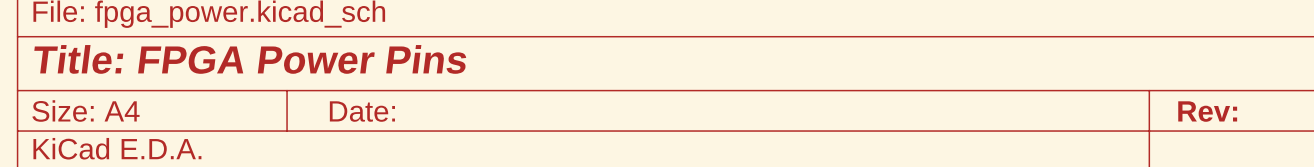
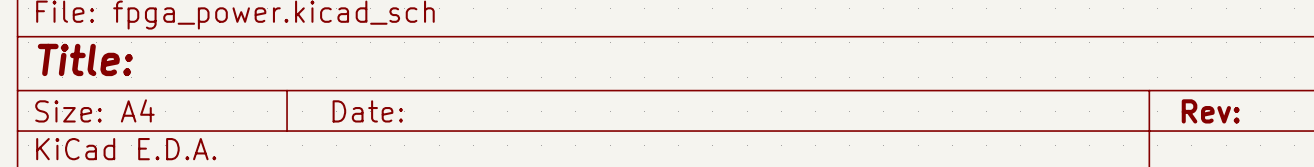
title block: Title: FPGA Power Pins (250, 59) -> Title: (85, 59)

